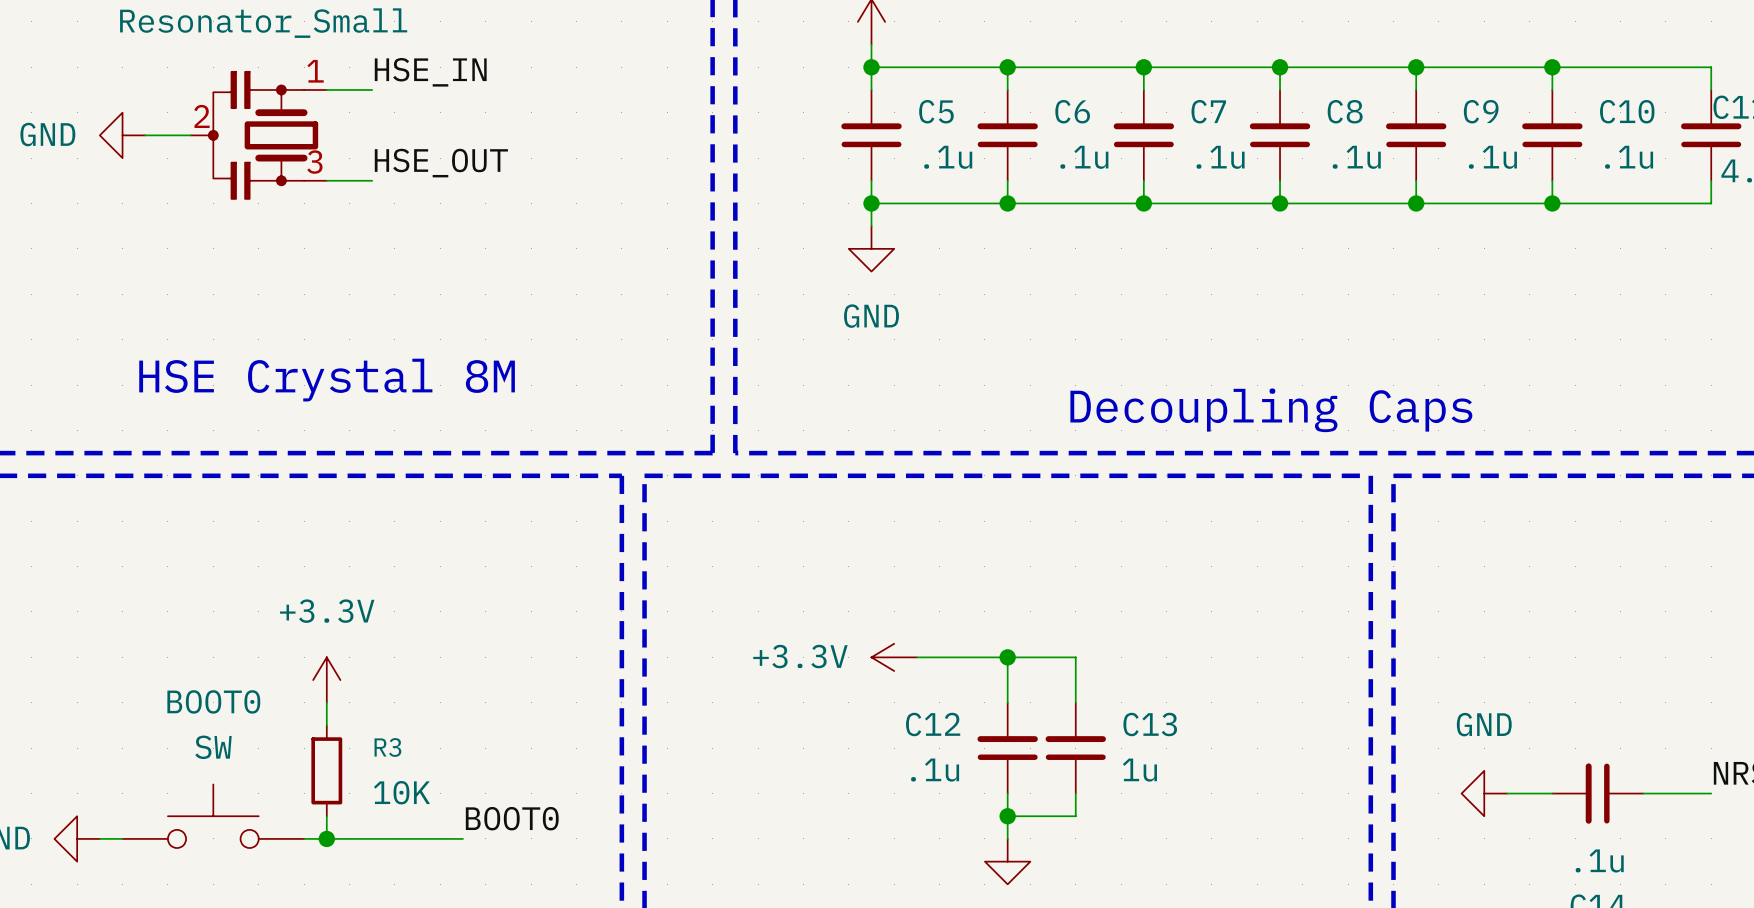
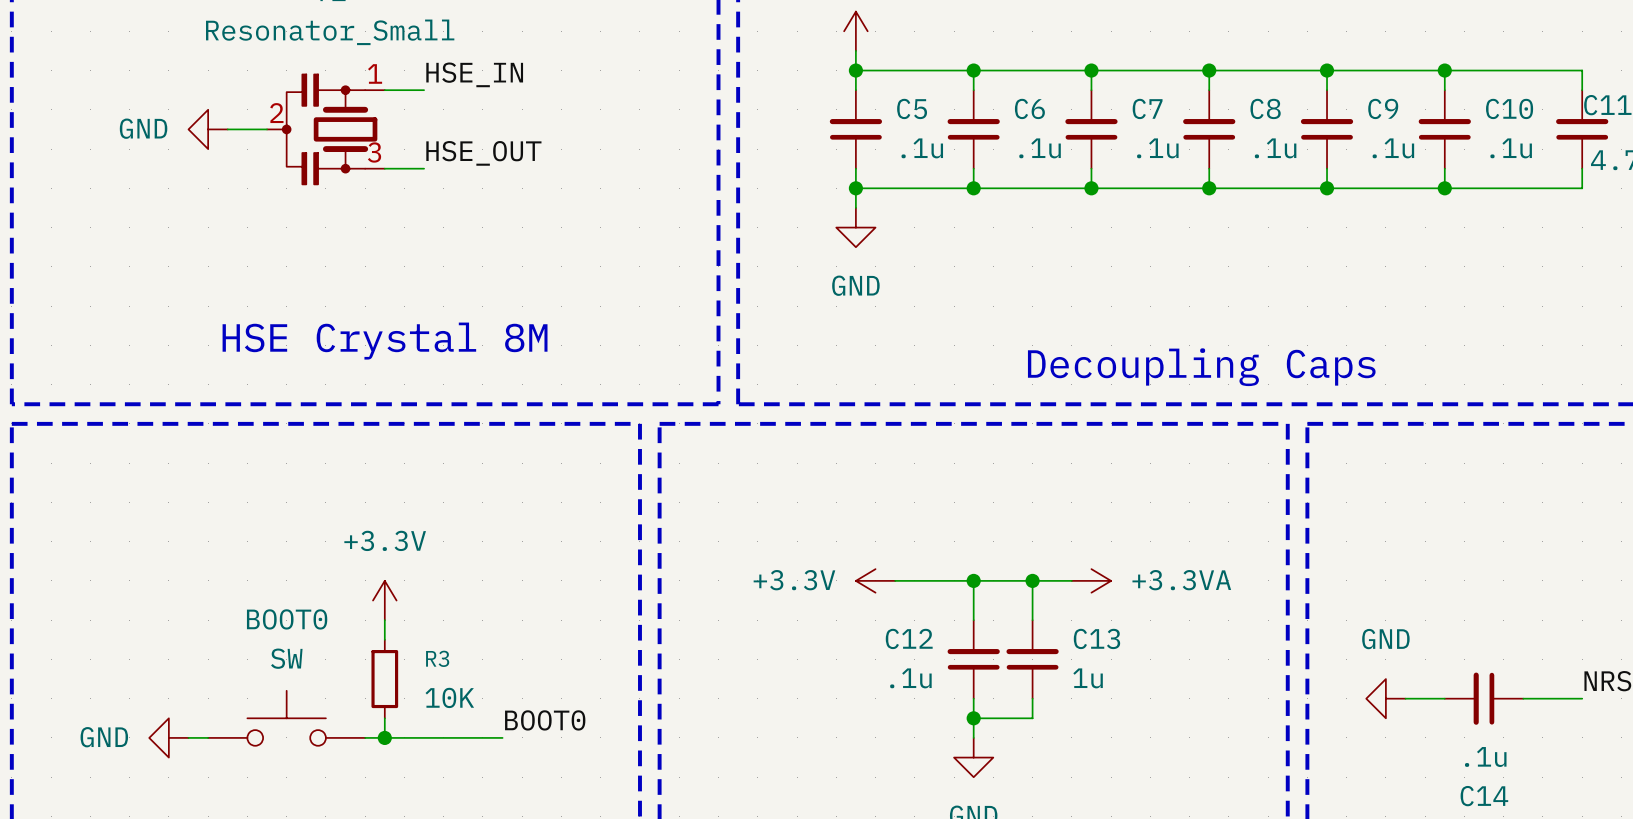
wire: none -> (1032, 580) (1071, 580)
junction: none -> (1032, 580)
power symbol: none -> +3.3VA (1091, 580)

